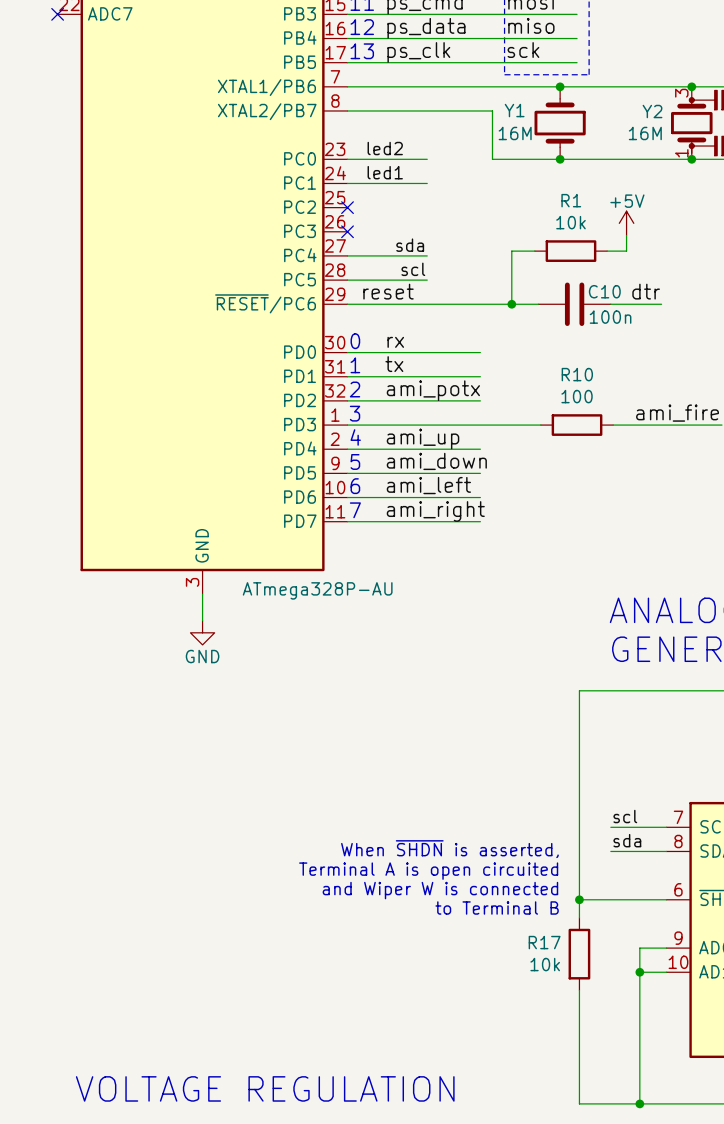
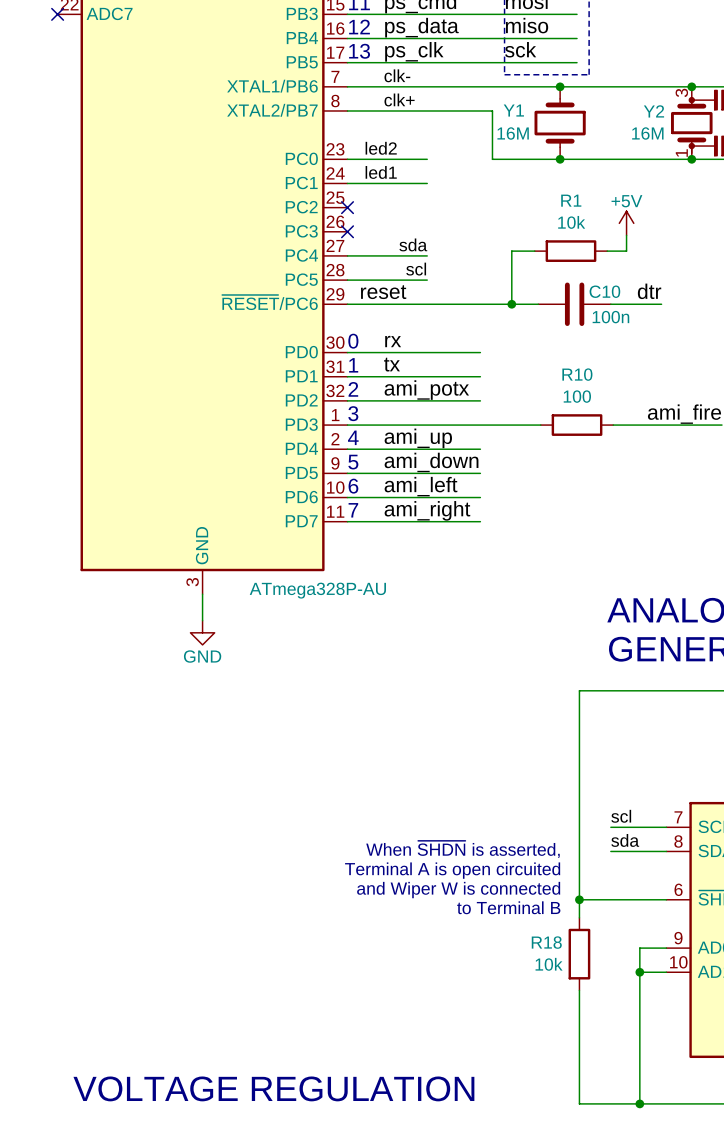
label: none -> clk- (397, 75)
label: none -> clk+ (399, 99)
R17 name: R17 (544, 942) -> R18 (546, 942)

